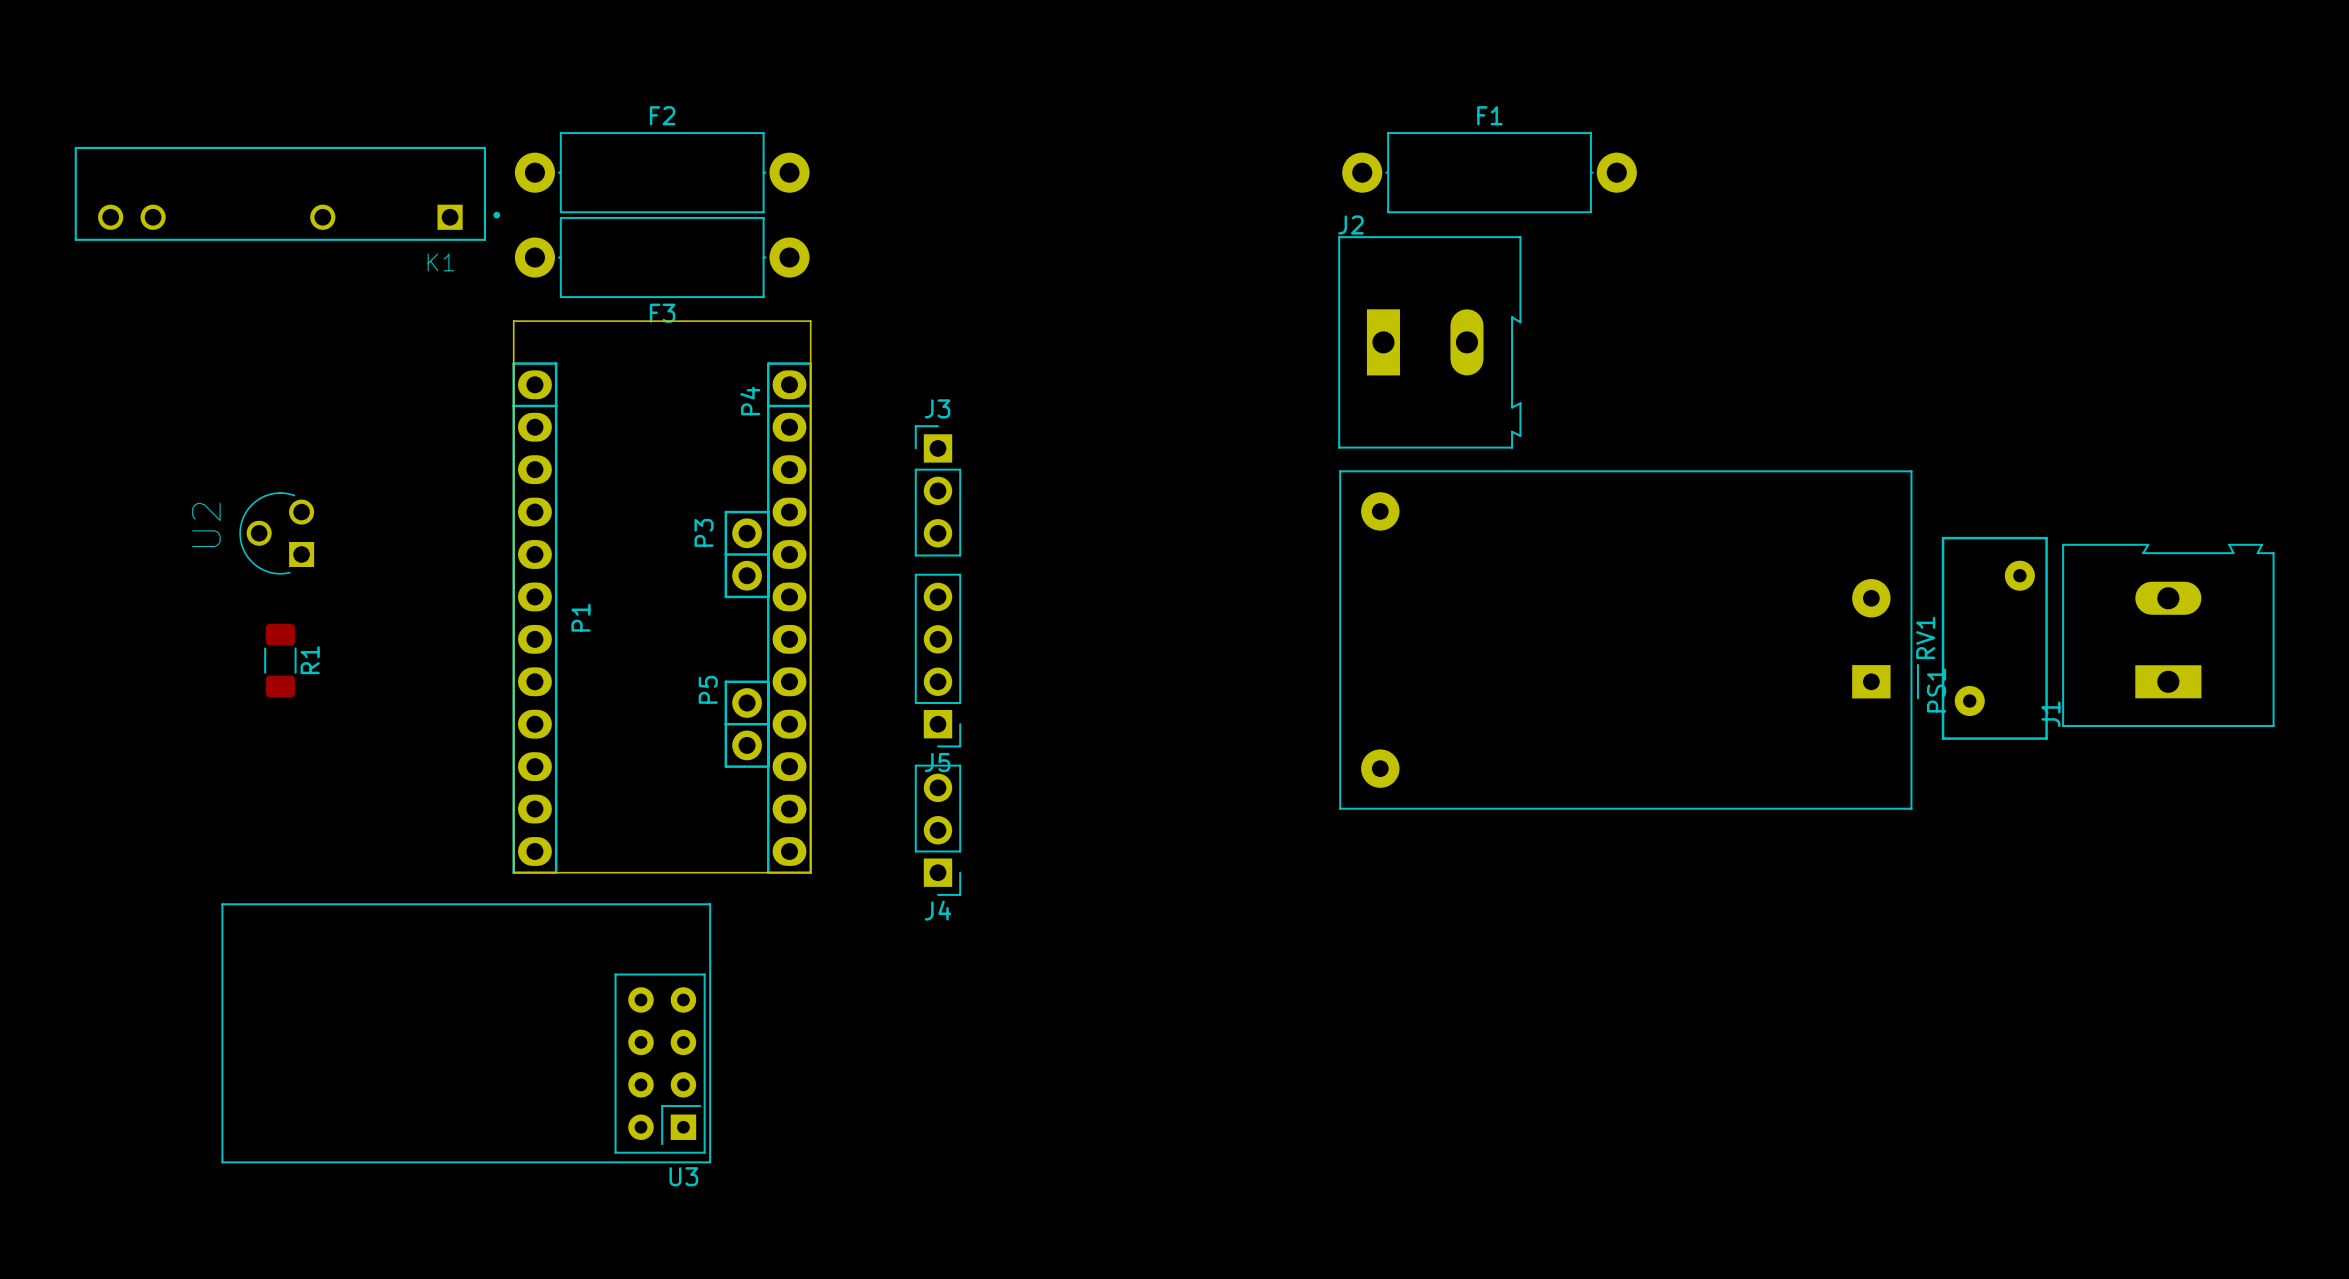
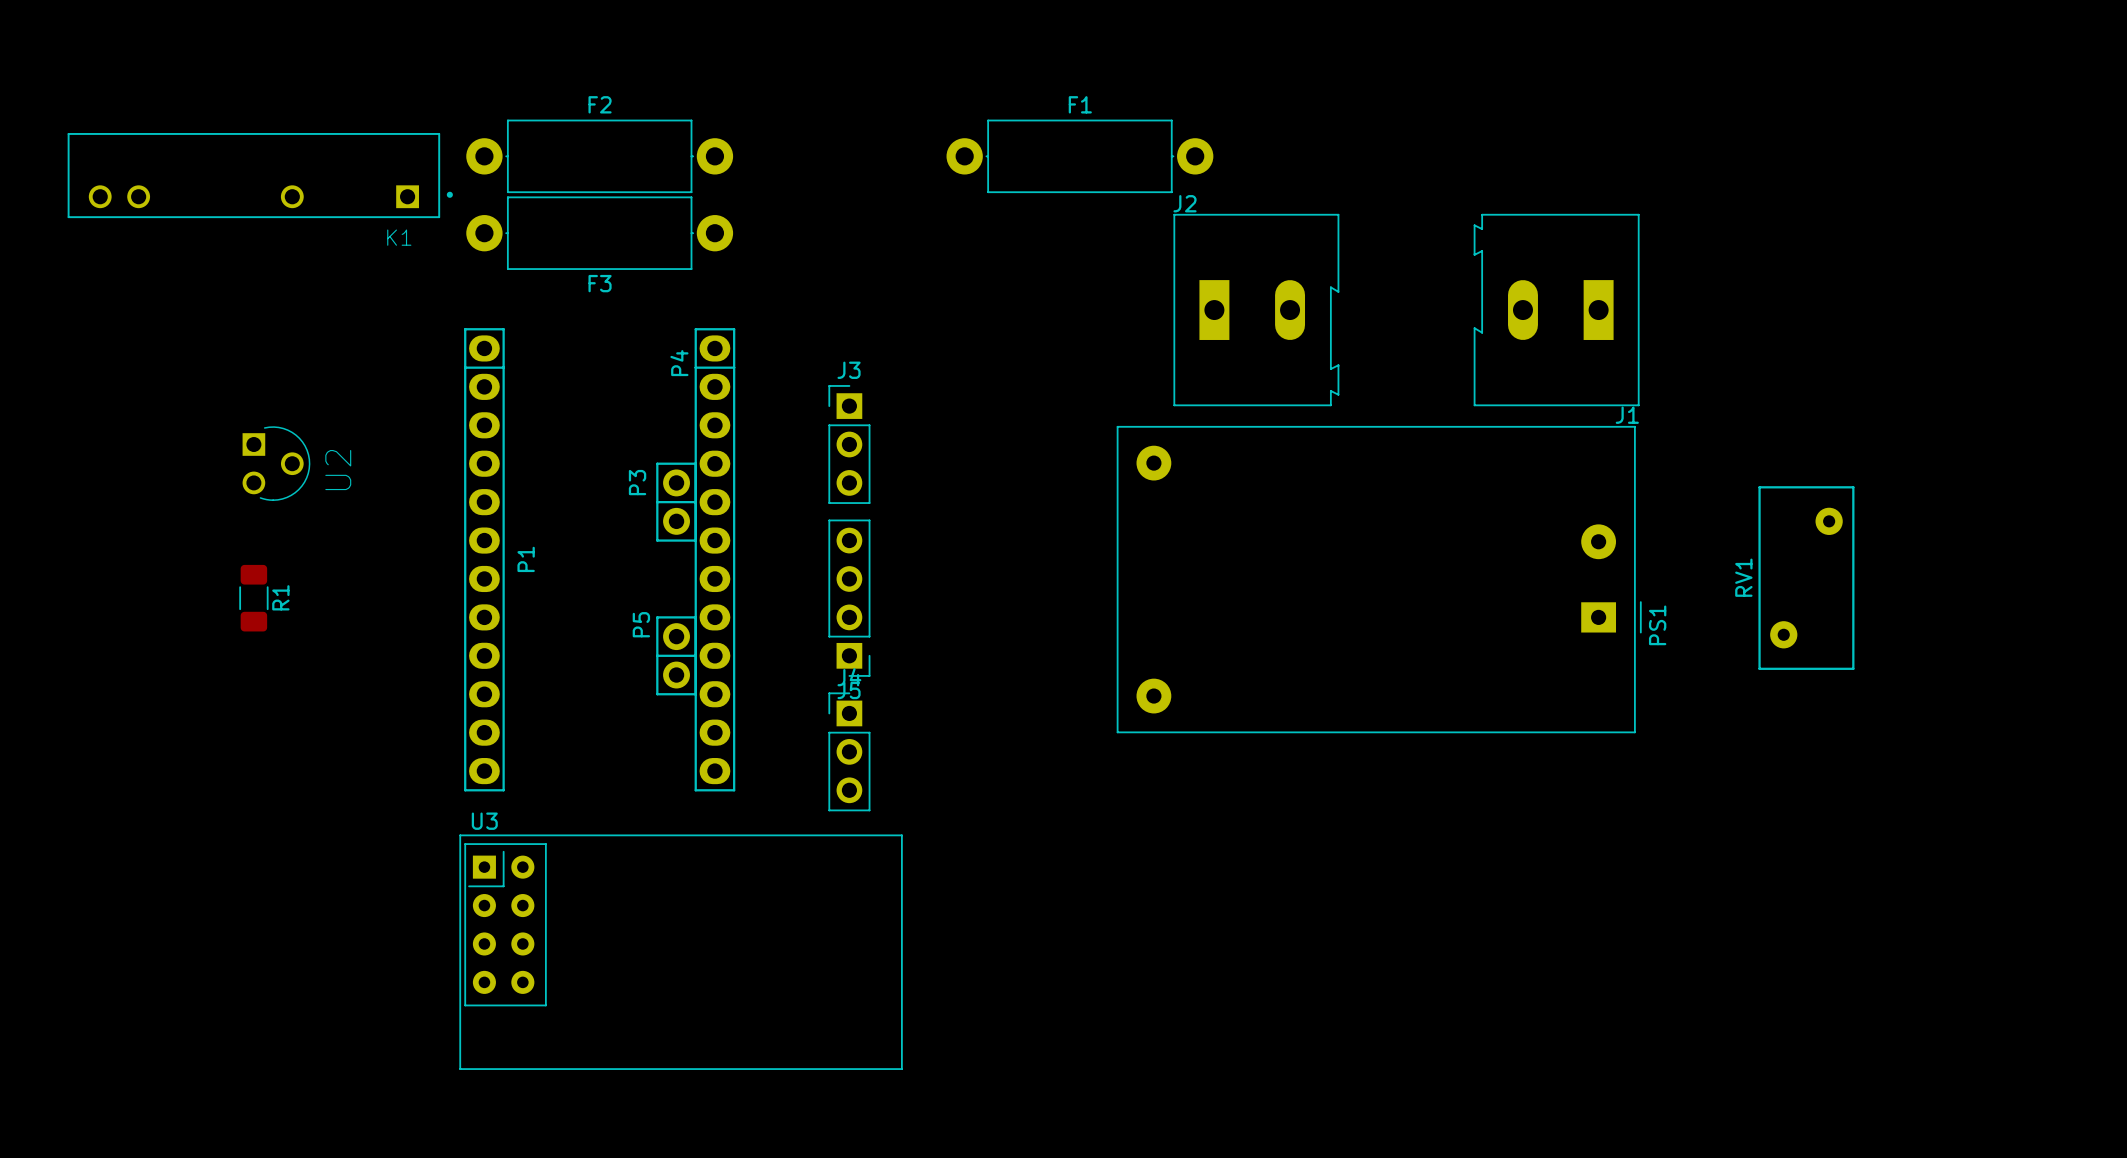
F1 position: (1489, 172) -> (1079, 156)
board edge: (513, 321) (810, 321) (810, 872) (513, 872) (513, 321) -> none
J2 position: (1429, 342) -> (1256, 310)
U2 rotation: 0° (276, 533) -> 180° (276, 463)
J1 rotation: 0° (2168, 635) -> 90° counterclockwise (1556, 310)
J1 position: (2168, 635) -> (1556, 310)
PS1 position: (1629, 640) -> (1379, 579)
J4 rotation: 0° (937, 830) -> 180° (849, 751)
U3 rotation: 0° (466, 1033) -> 180° (681, 952)

